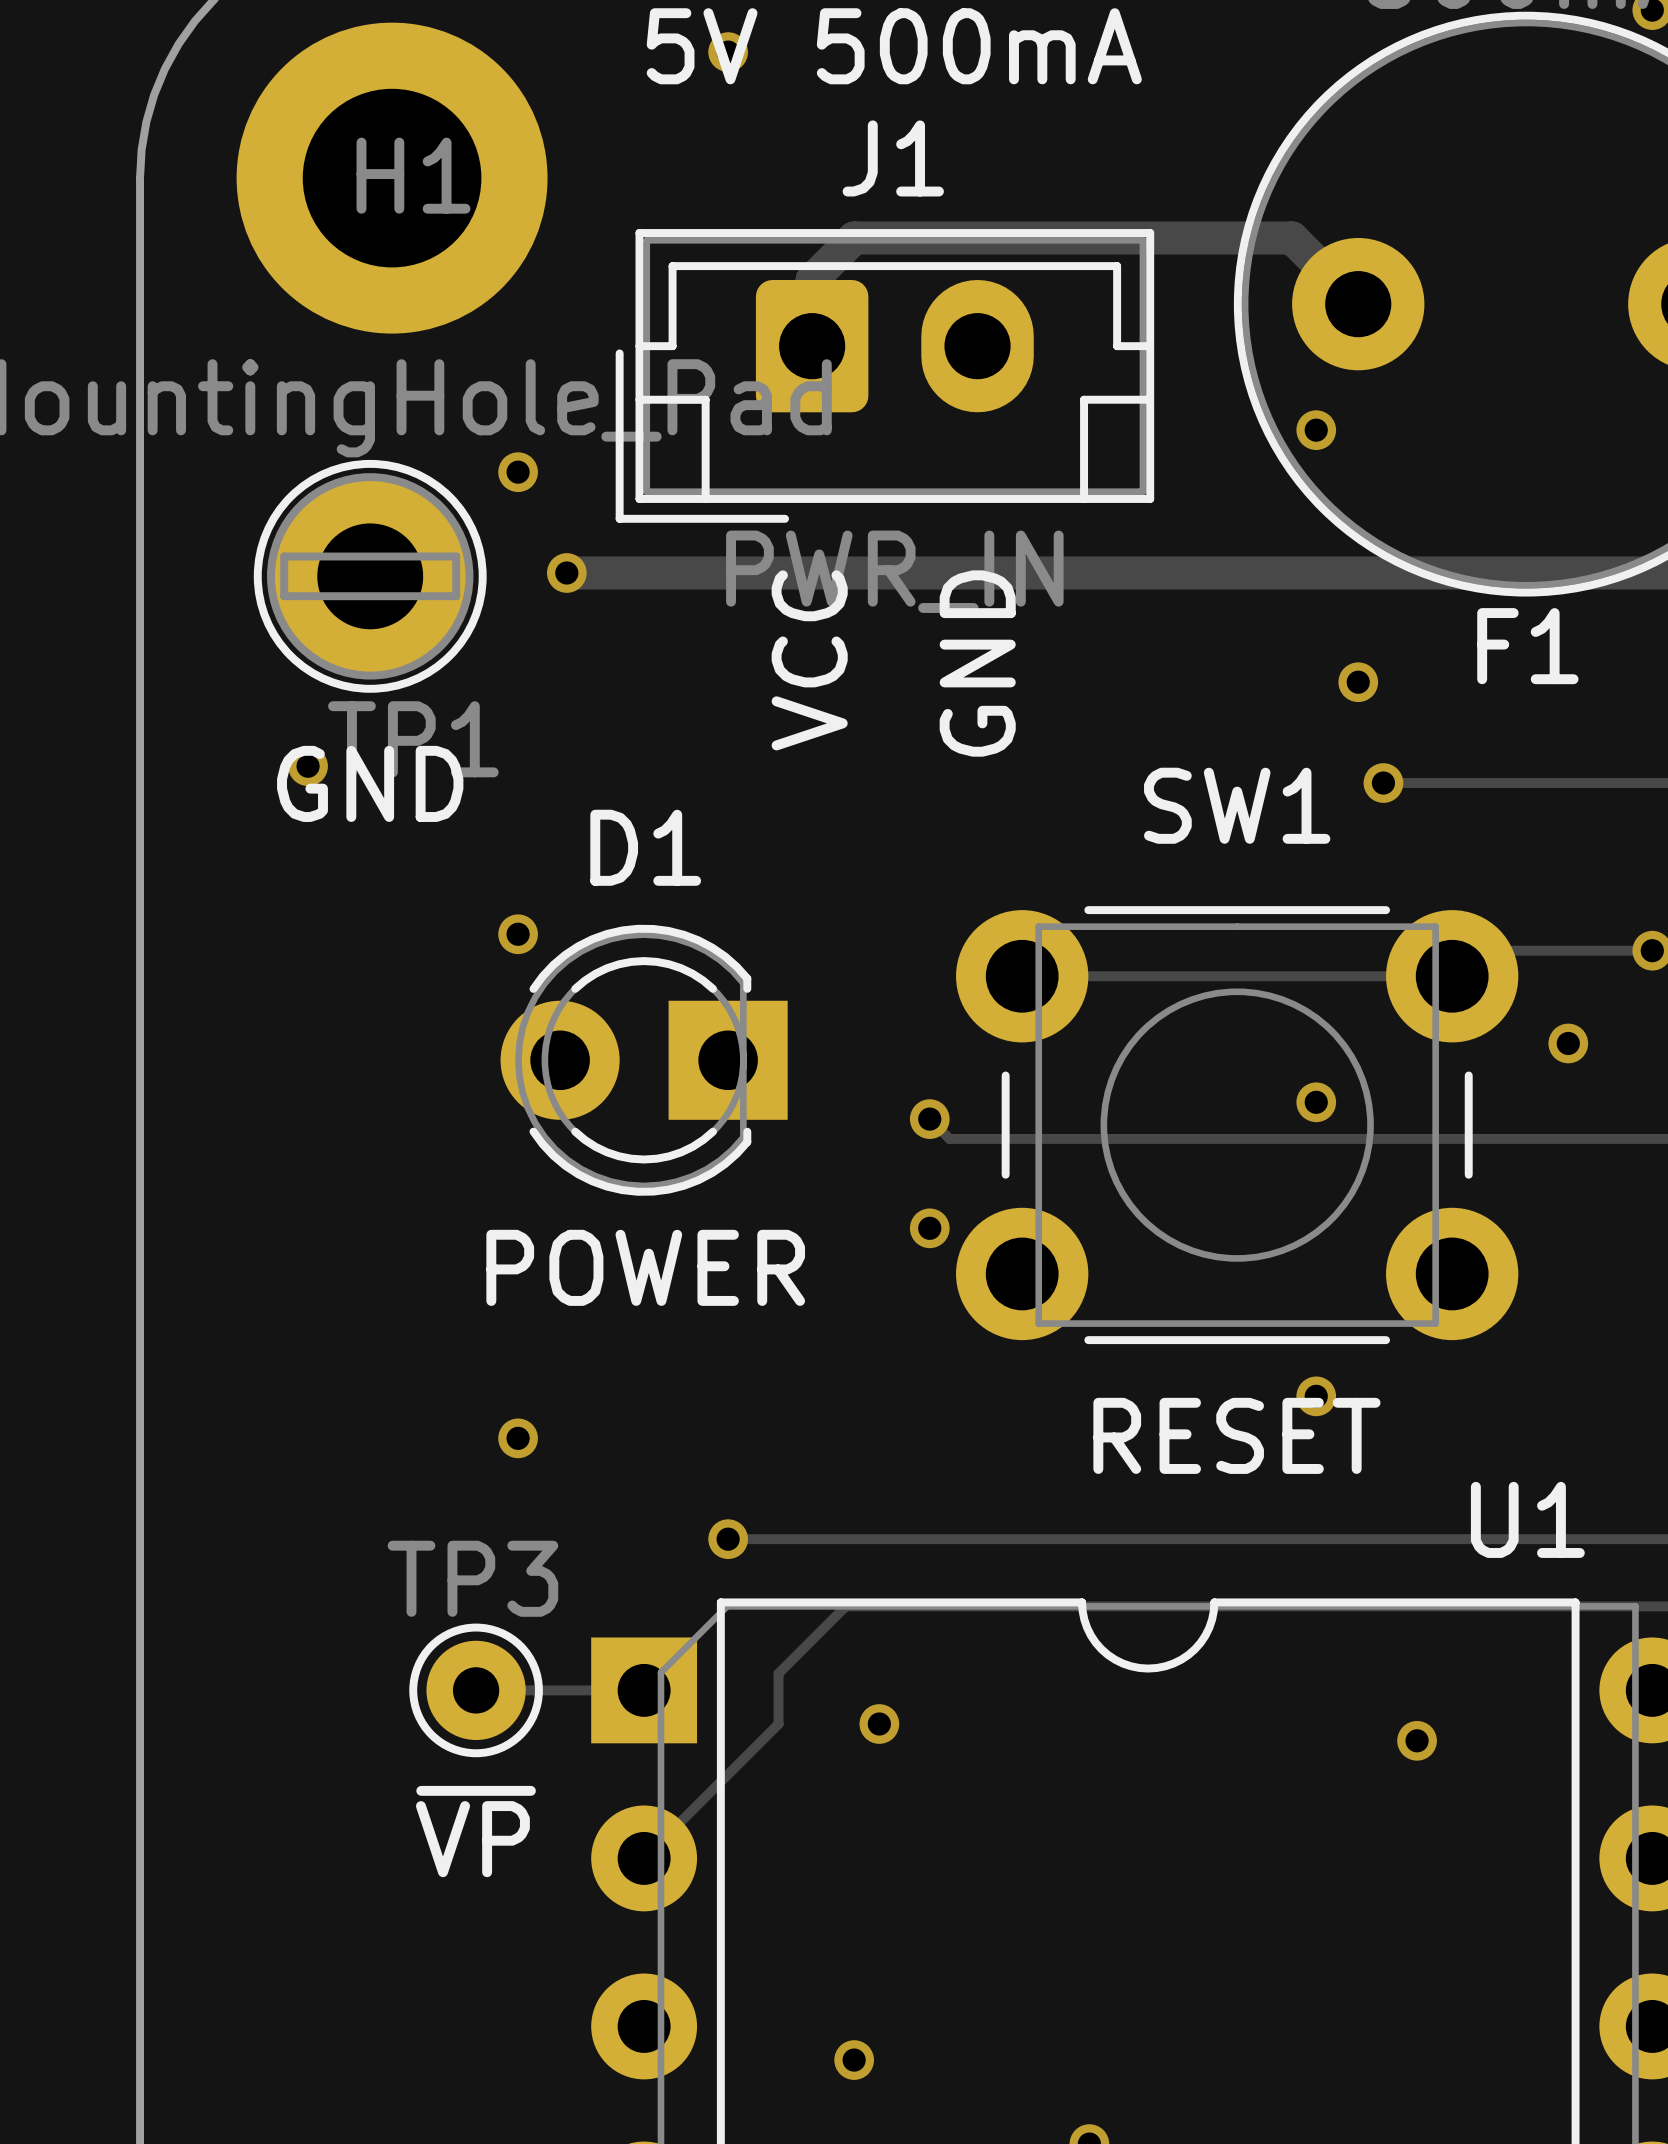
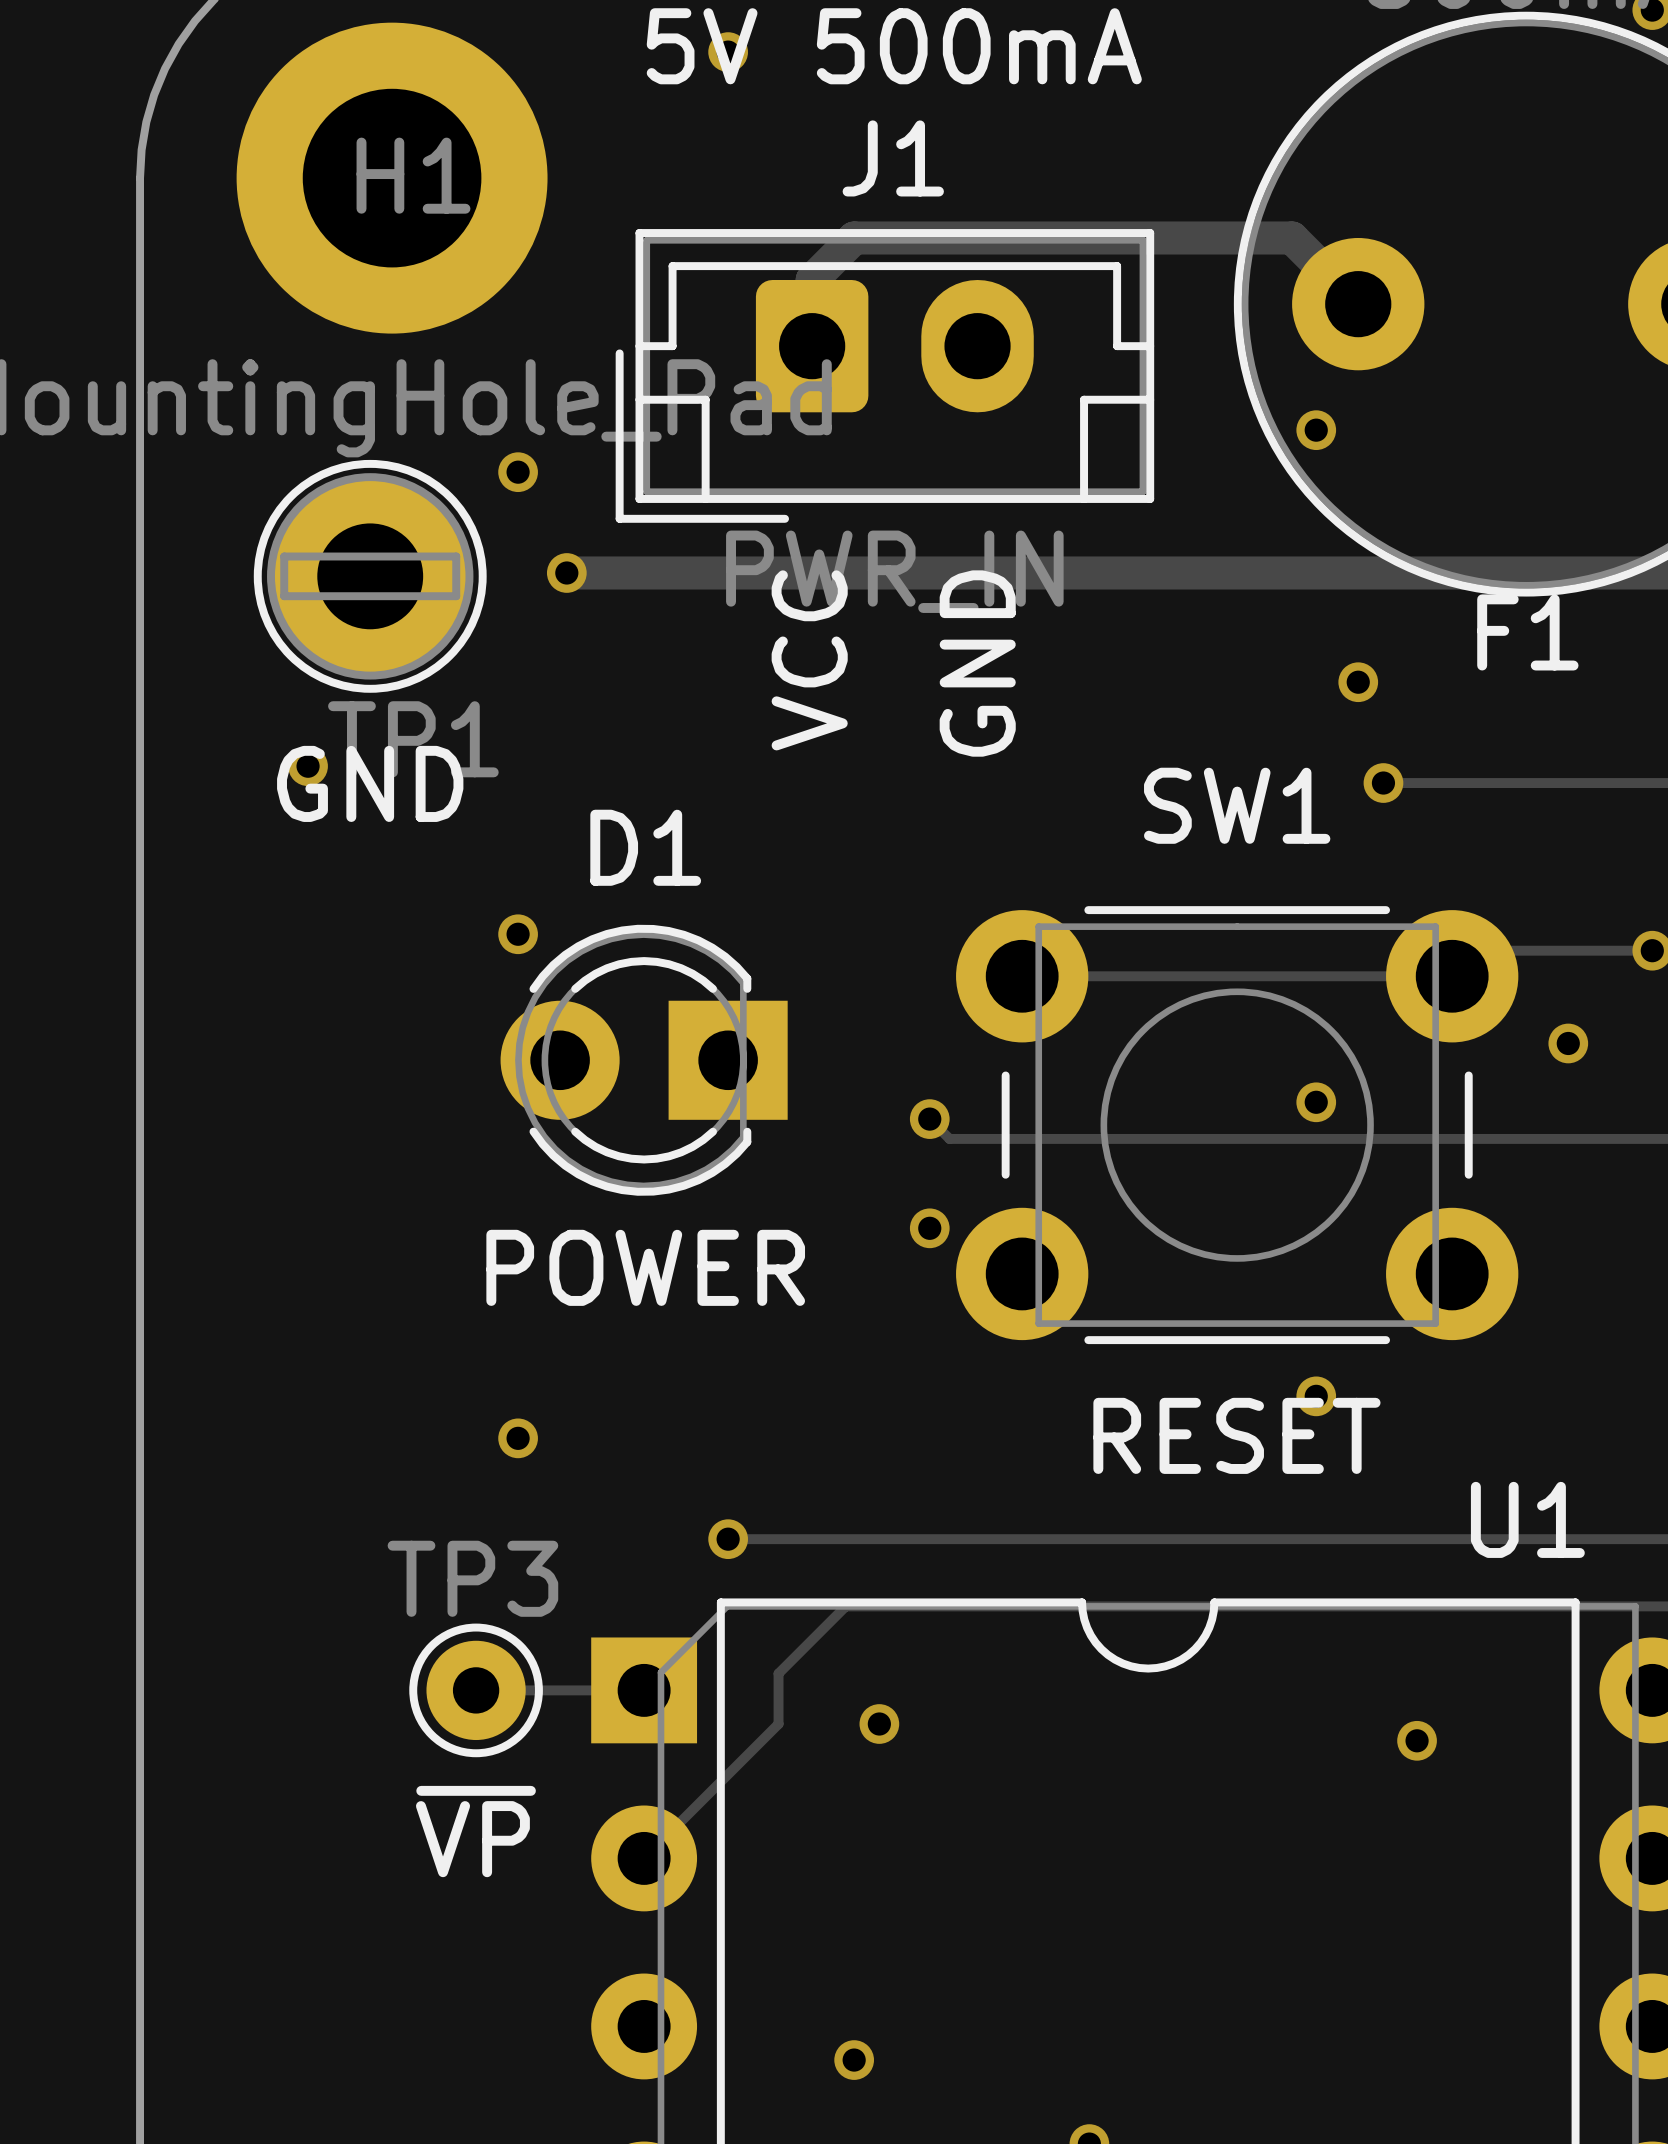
F1 name position: F1 (1527, 646) -> F1 (1527, 632)

